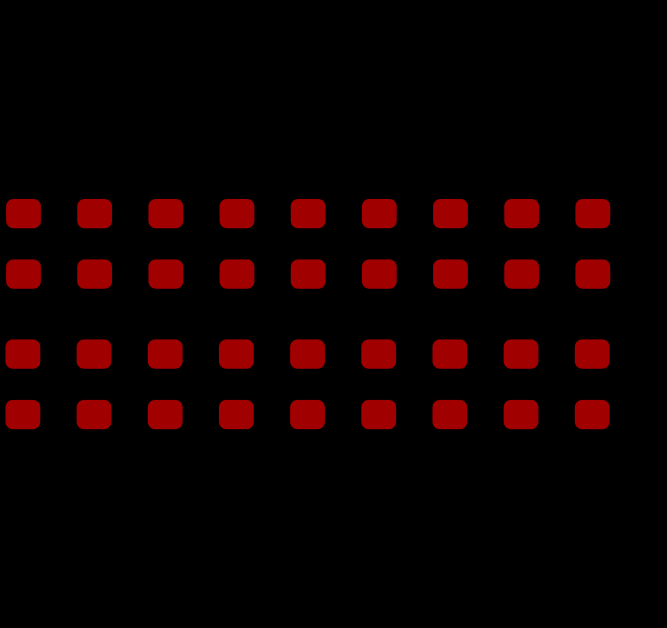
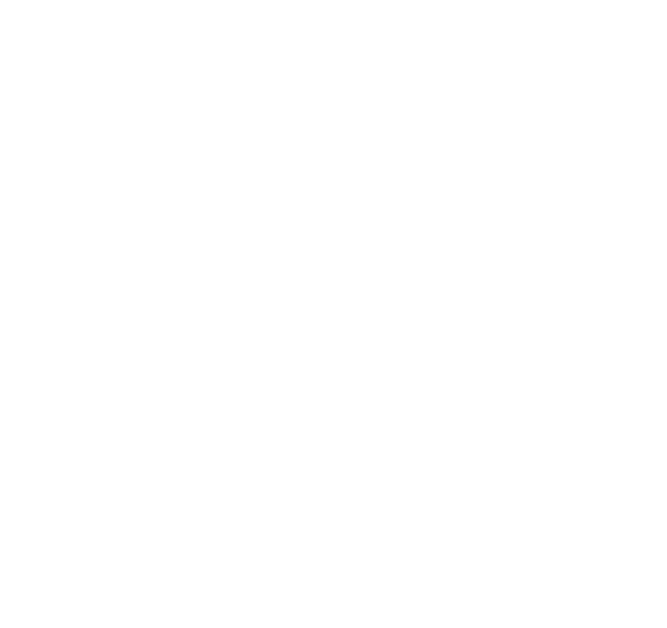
part: (23, 243) -> none
part: (94, 243) -> none
part: (165, 243) -> none
part: (236, 243) -> none
part: (308, 243) -> none
part: (379, 243) -> none
part: (450, 243) -> none
part: (521, 243) -> none
part: (592, 243) -> none
part: (22, 384) -> none
part: (94, 384) -> none
part: (165, 384) -> none
part: (236, 384) -> none
part: (307, 384) -> none
part: (378, 384) -> none
part: (449, 384) -> none
part: (521, 384) -> none
part: (592, 384) -> none

